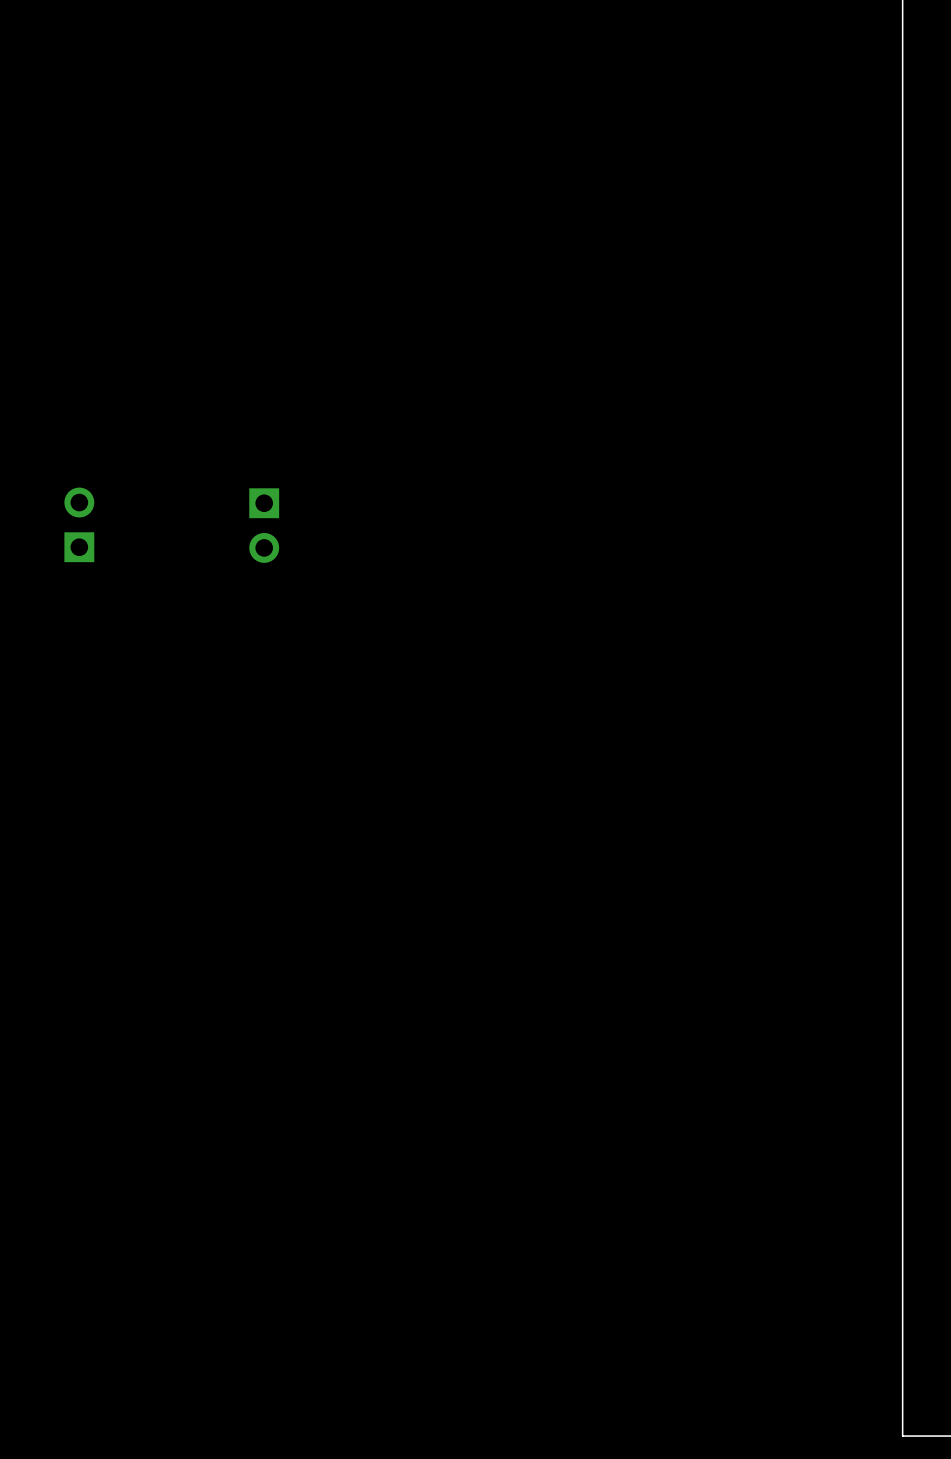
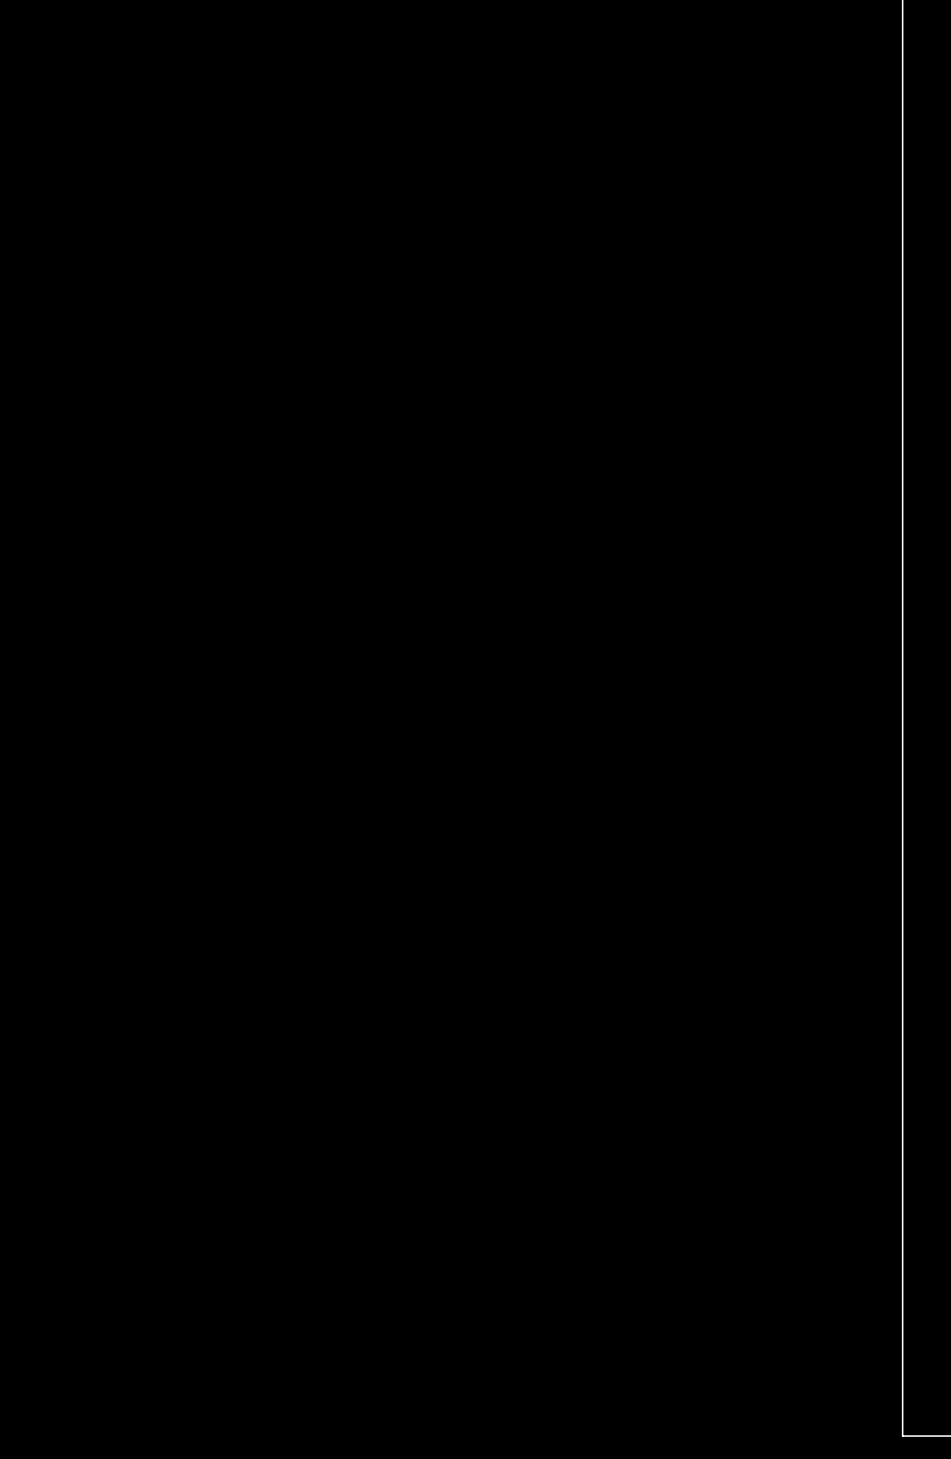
part: (79, 524) -> none
part: (264, 525) -> none

